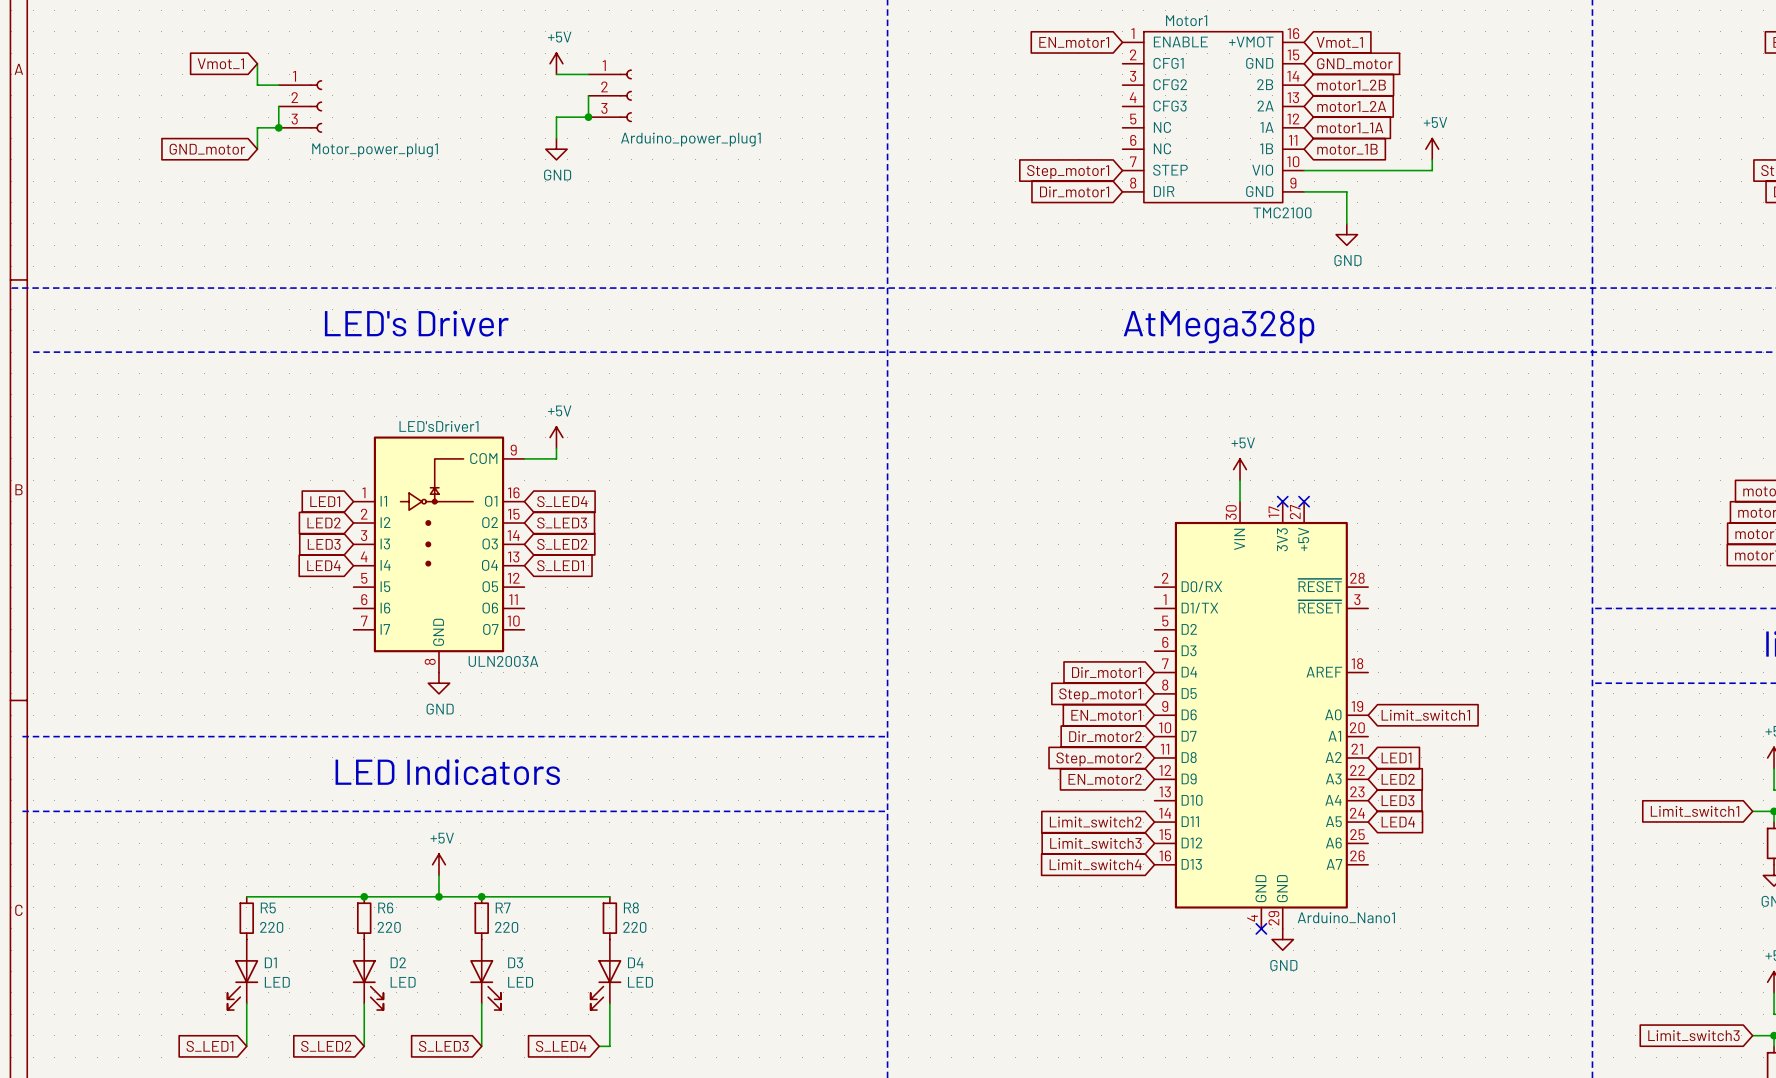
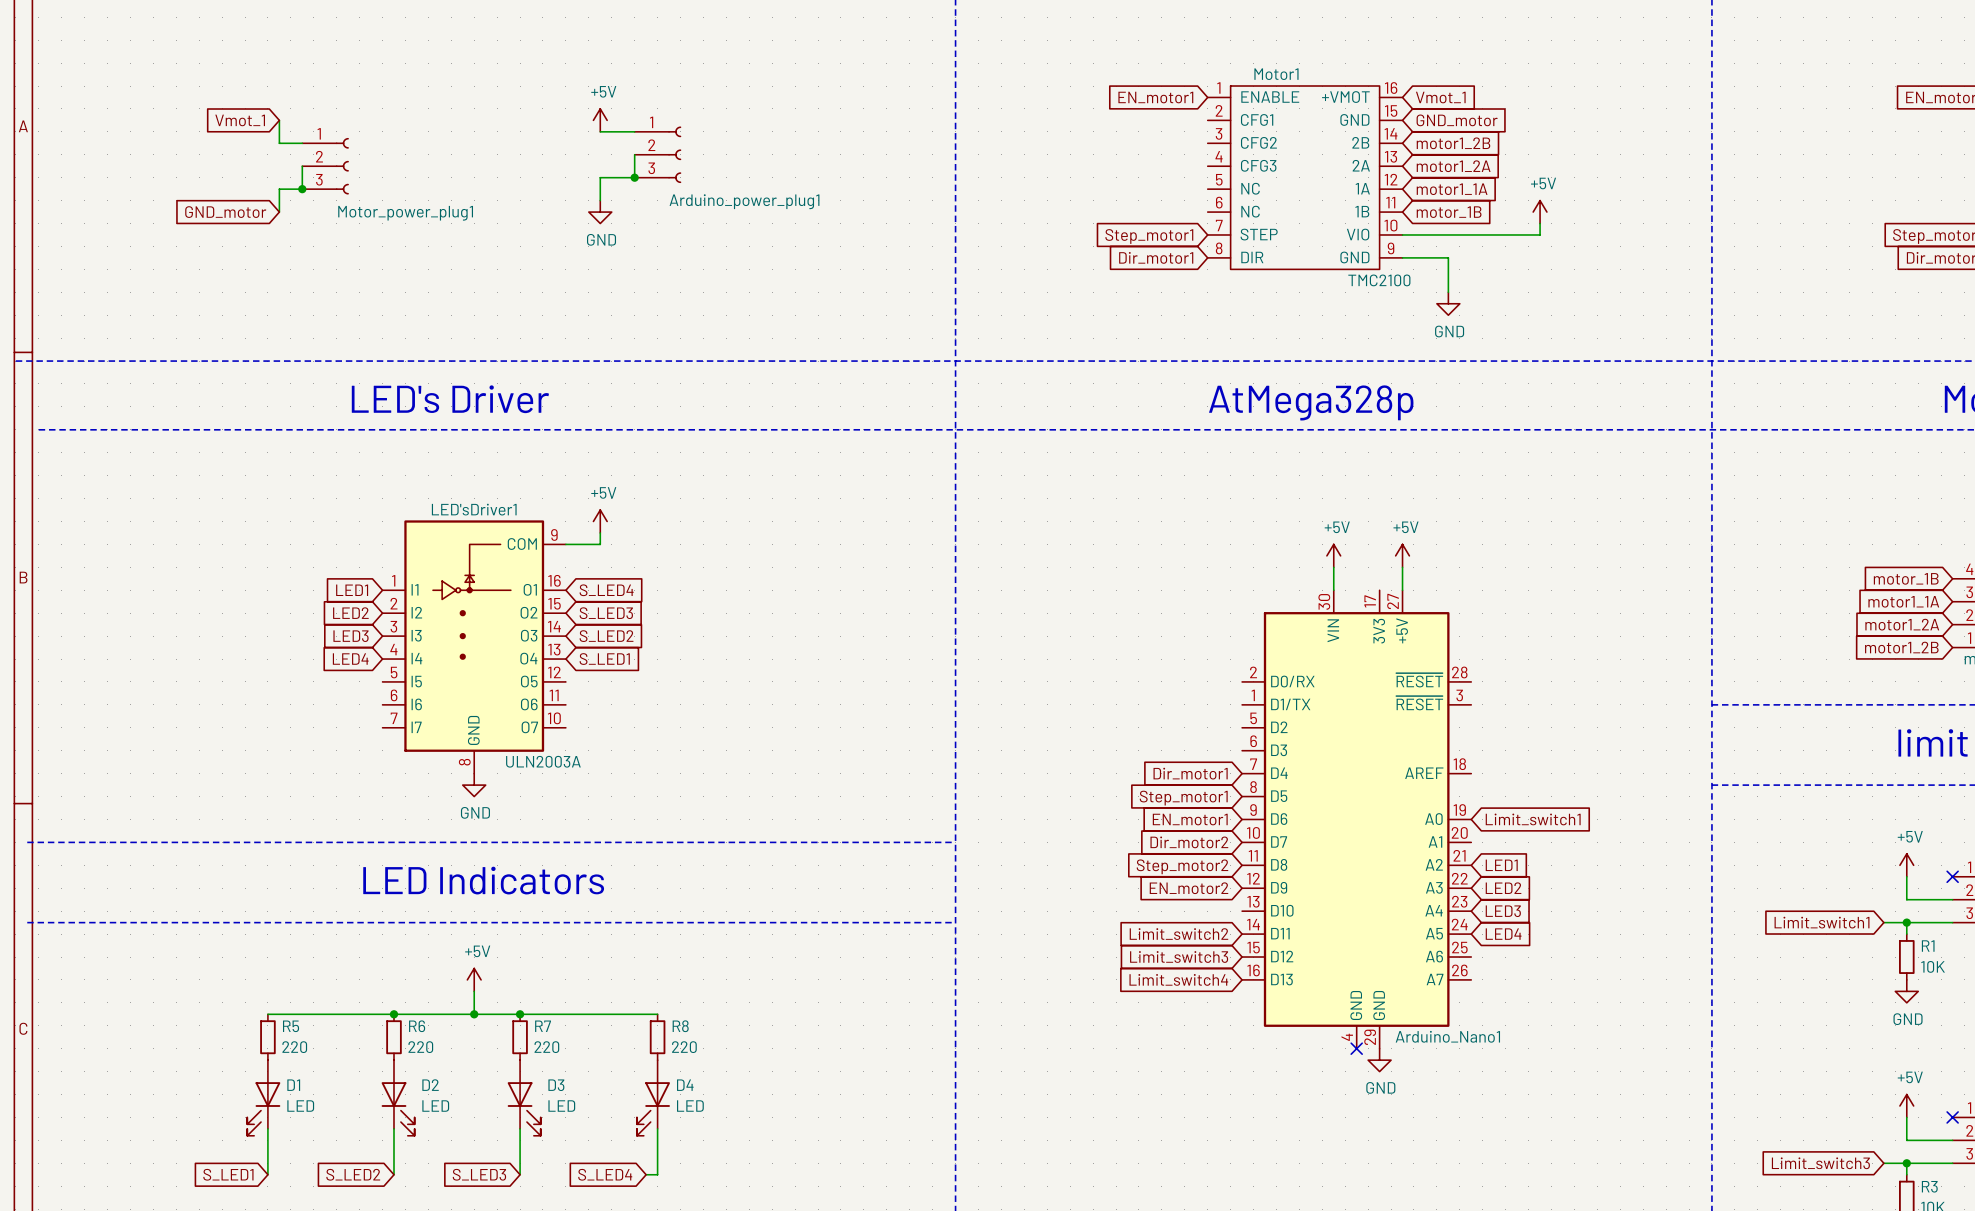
power symbol: none -> +5V (1402, 555)
wire: none -> (1402, 567) (1402, 590)
no-connect mark: (1282, 501) -> none
no-connect mark: (1304, 501) -> none

